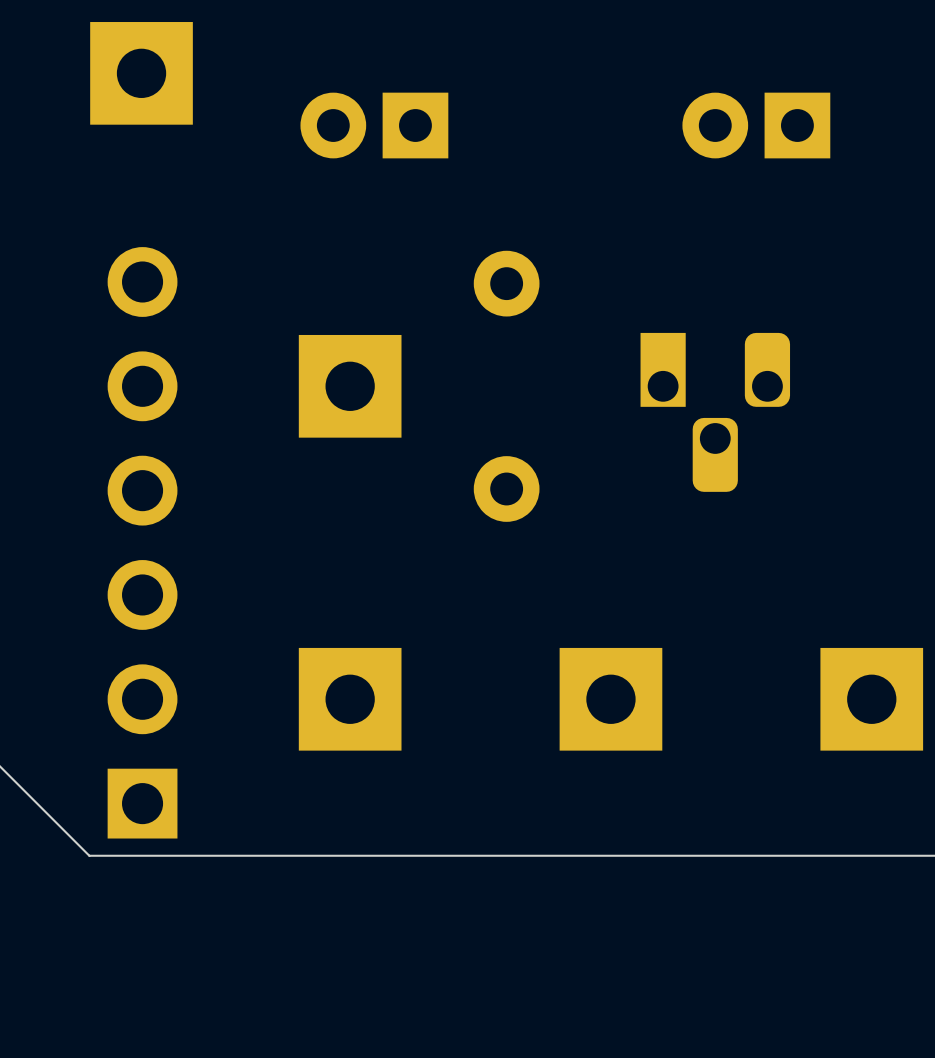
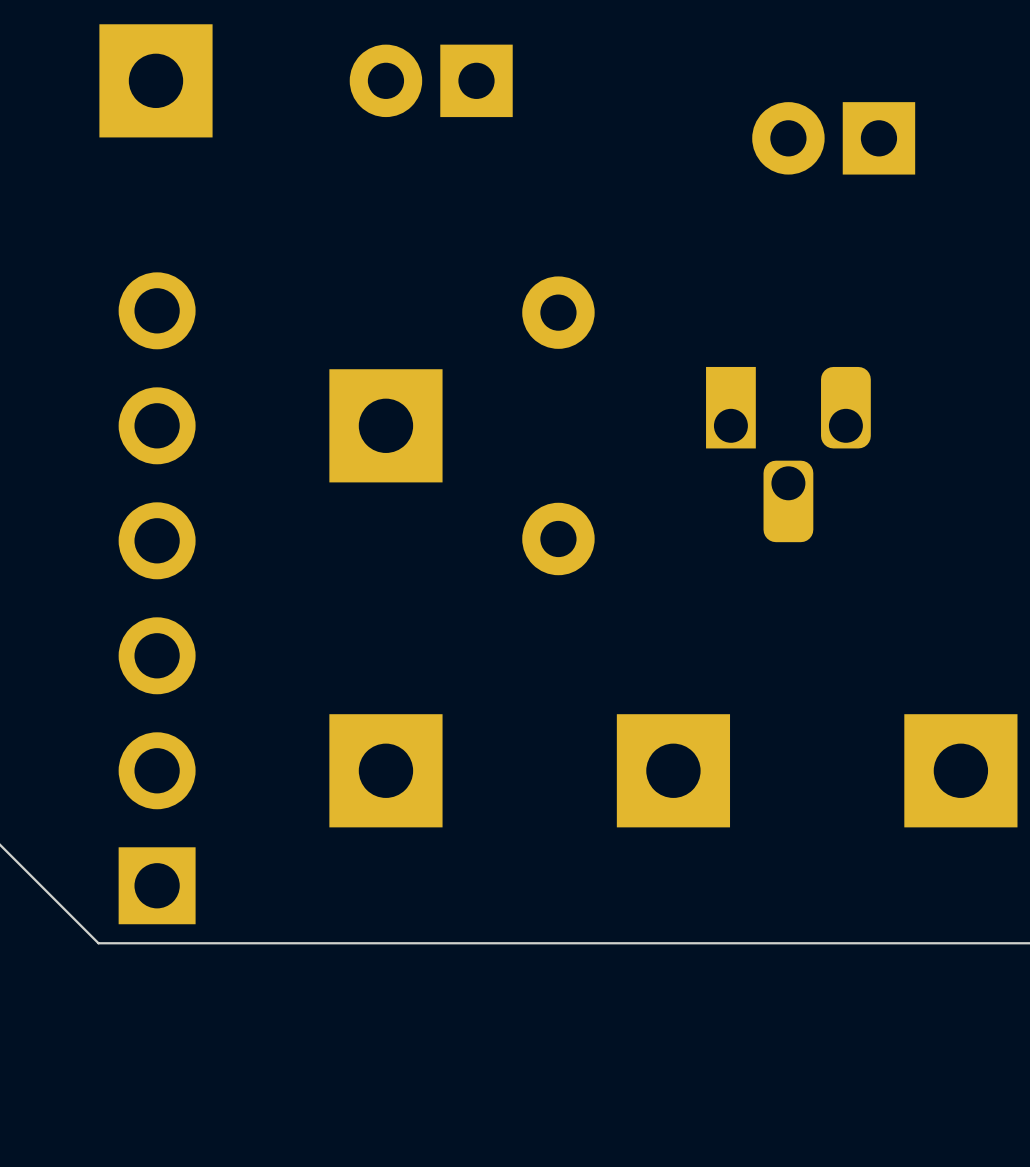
part position: (374, 125) -> (431, 80)

